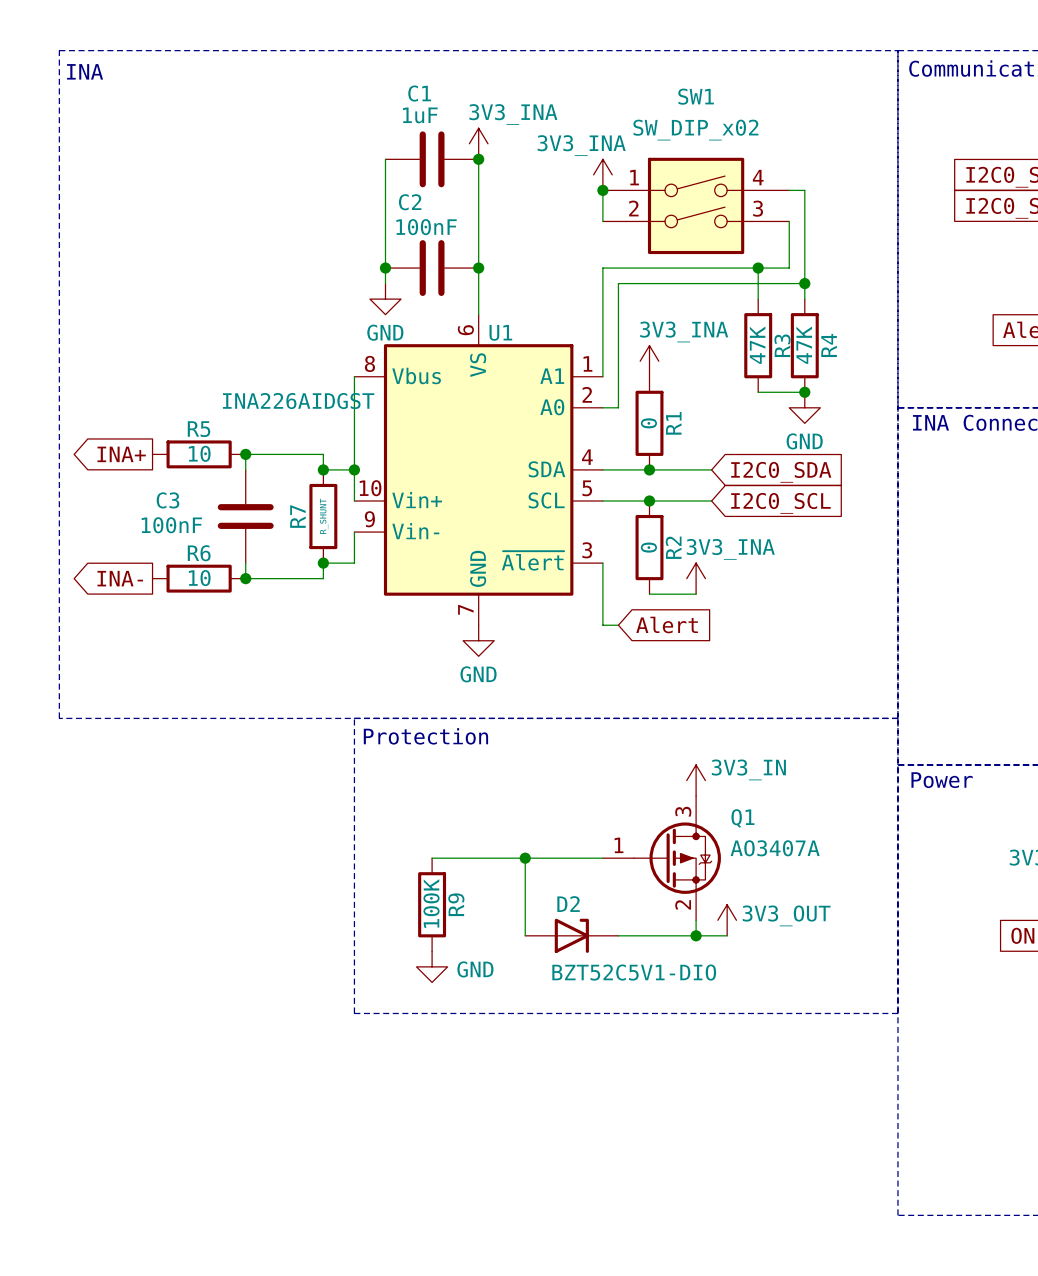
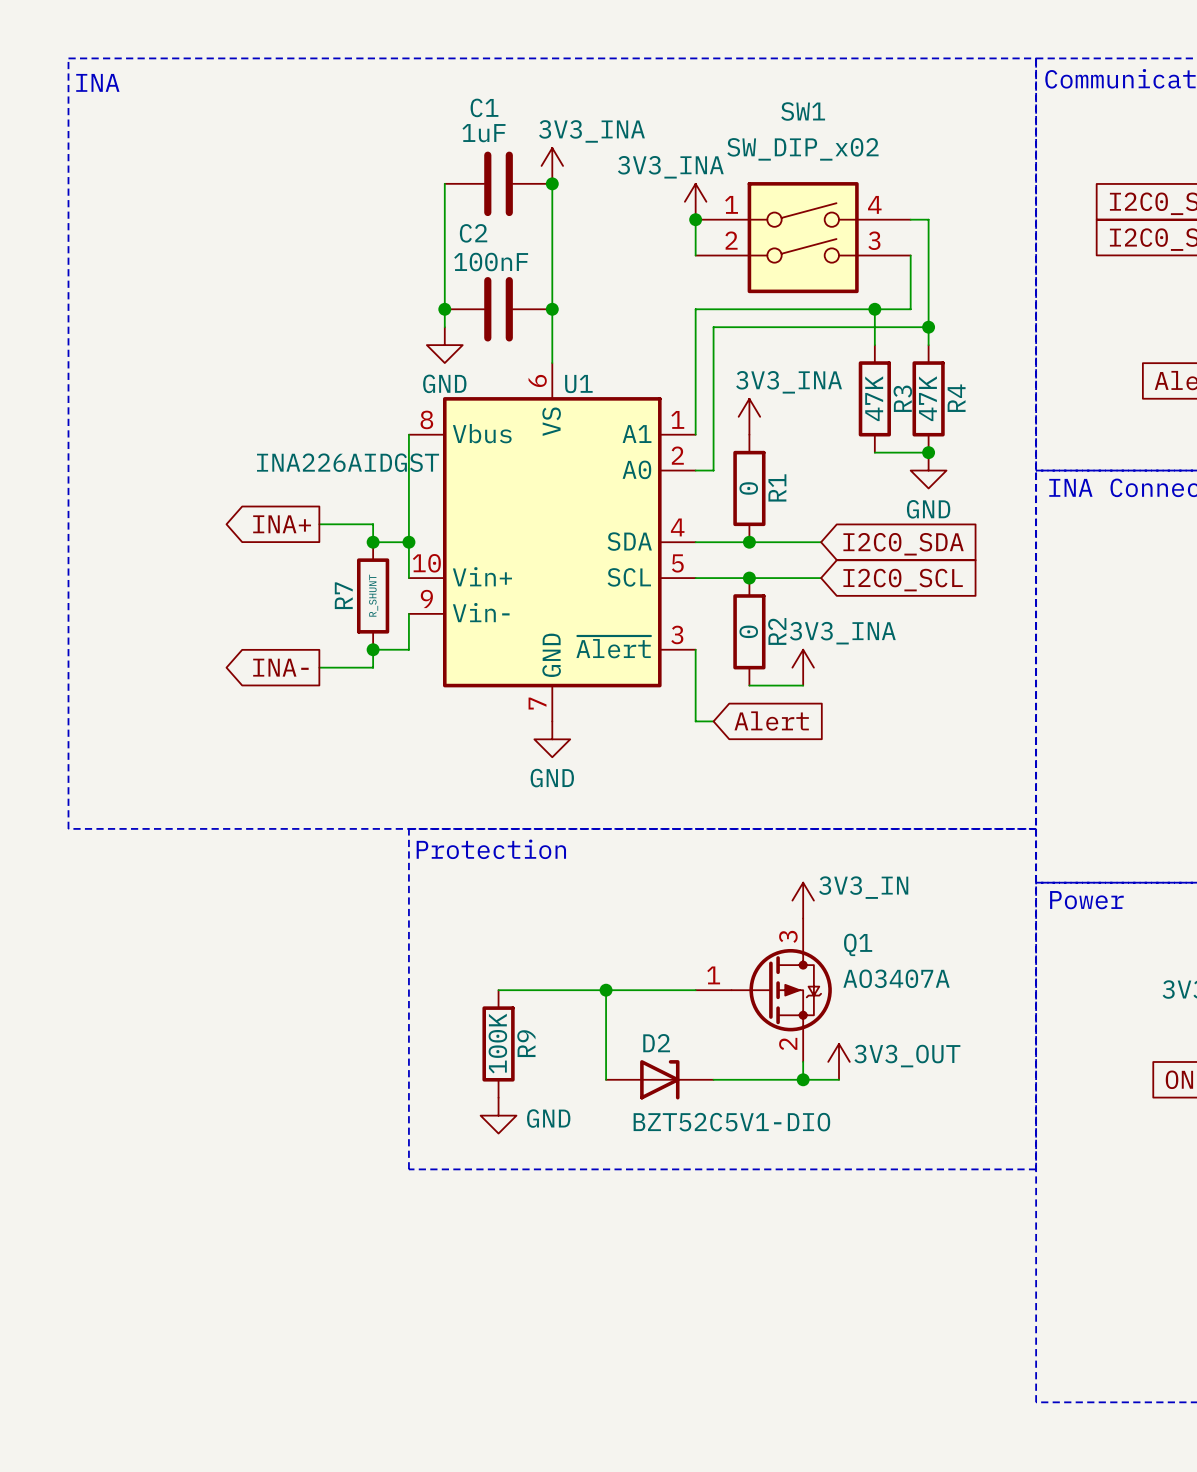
global label position: INA+ (121, 454) -> INA+ (282, 524)
R5: 10 (199, 454) -> none
junction: (245, 454) -> none
wire: (276, 454) (245, 454) (245, 469) -> none
C3: 100nF (245, 516) -> none
wire: (245, 563) (245, 578) (276, 578) -> none
global label position: INA- (120, 578) -> INA- (280, 667)
R6: 10 (199, 578) -> none
junction: (245, 578) -> none

